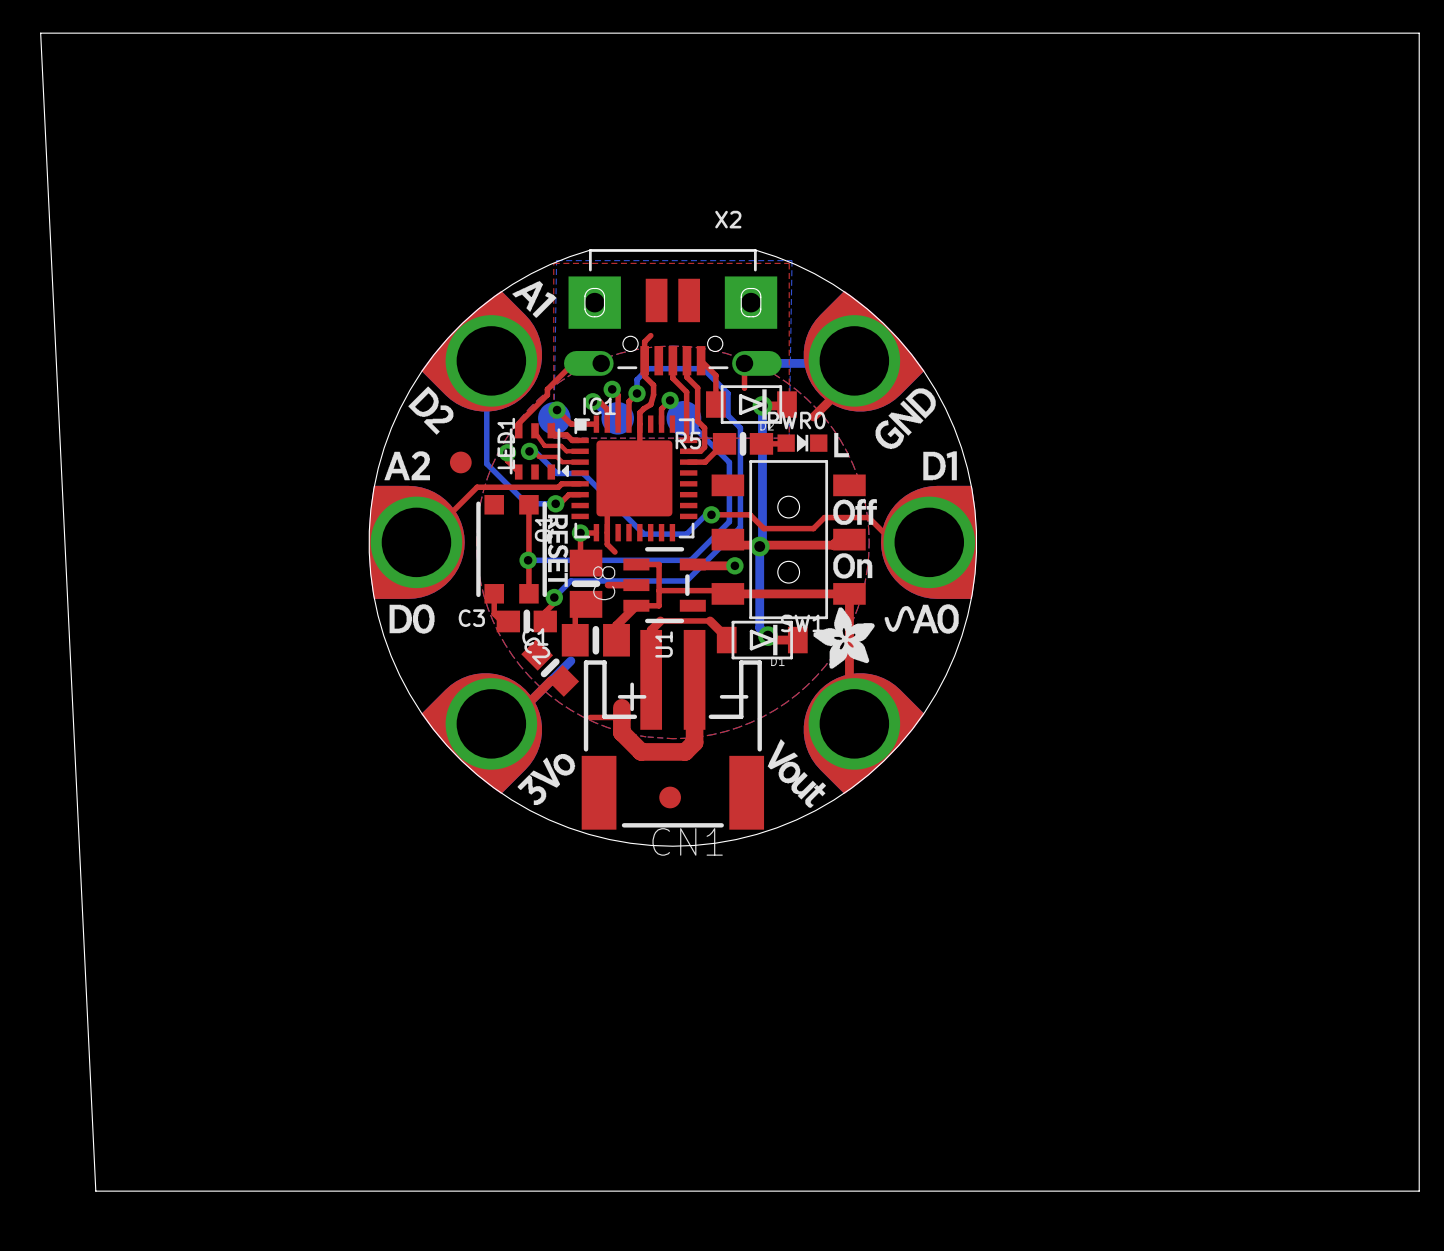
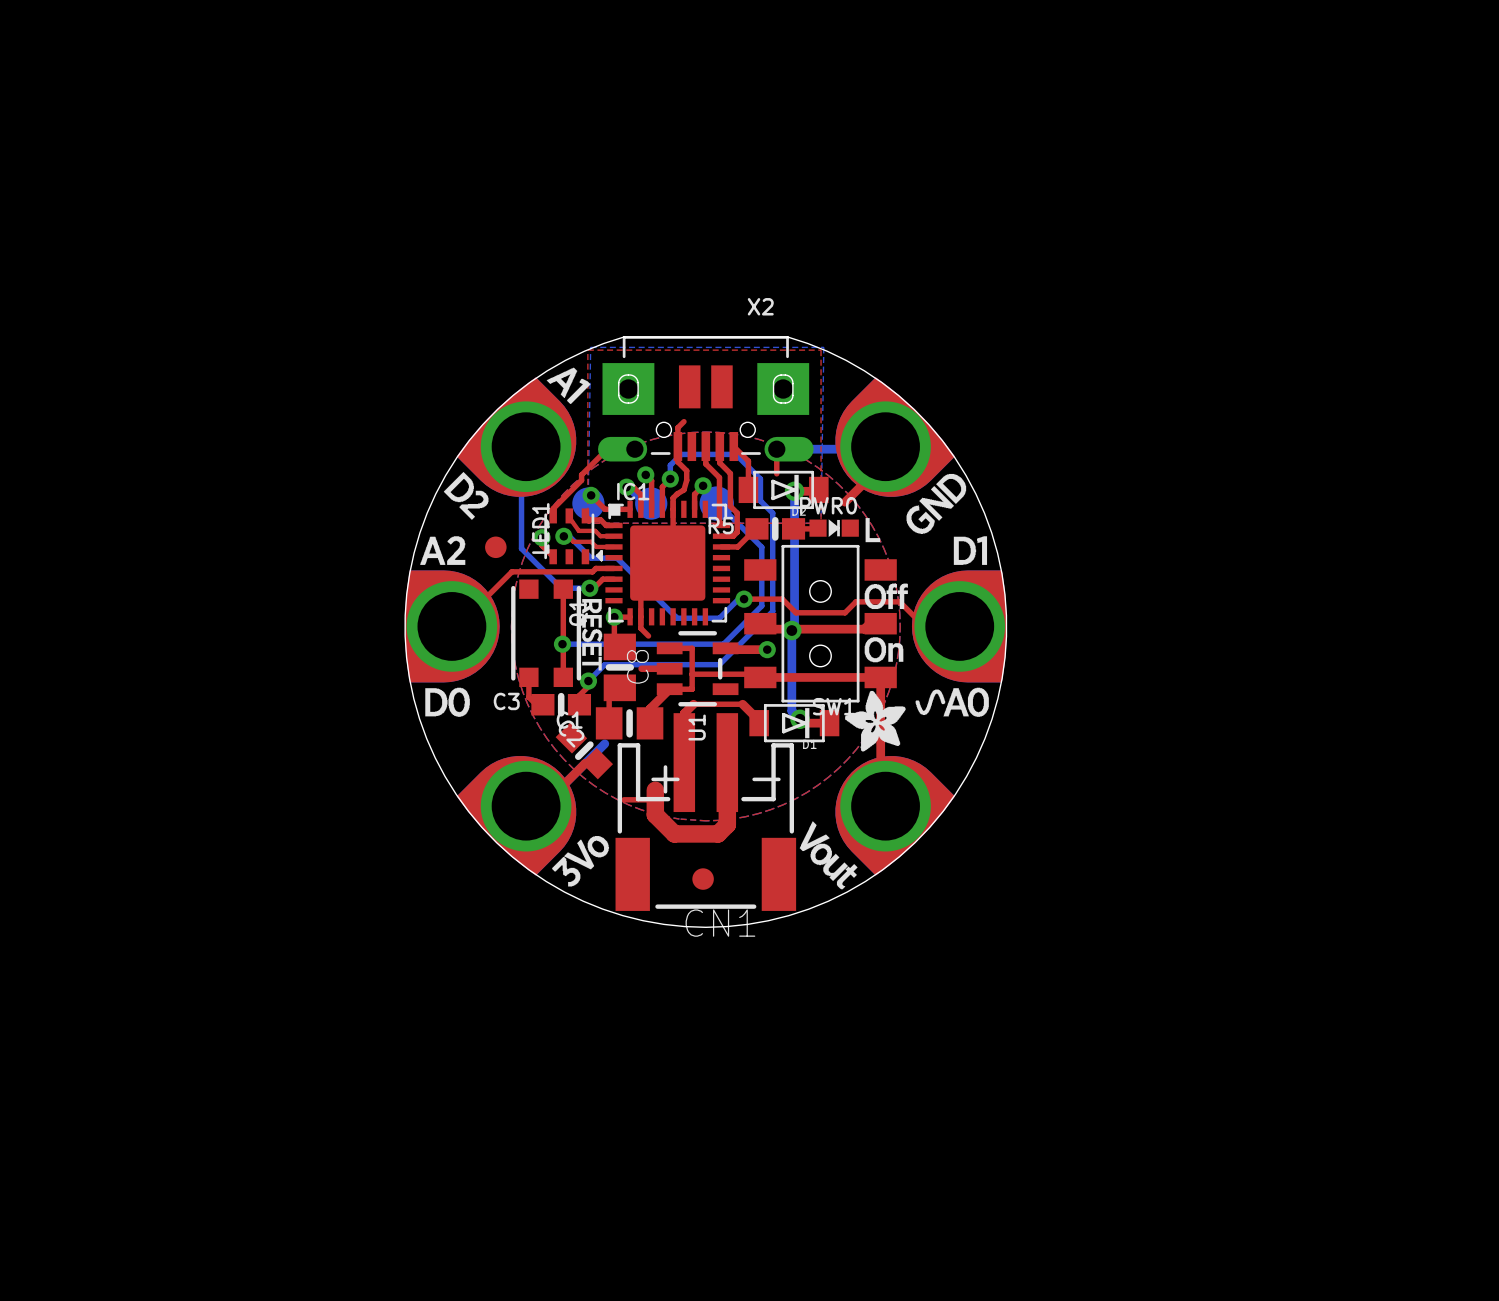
board edge: (40, 33) (1419, 33) (1419, 1191) (95, 1191) (40, 33) -> none

